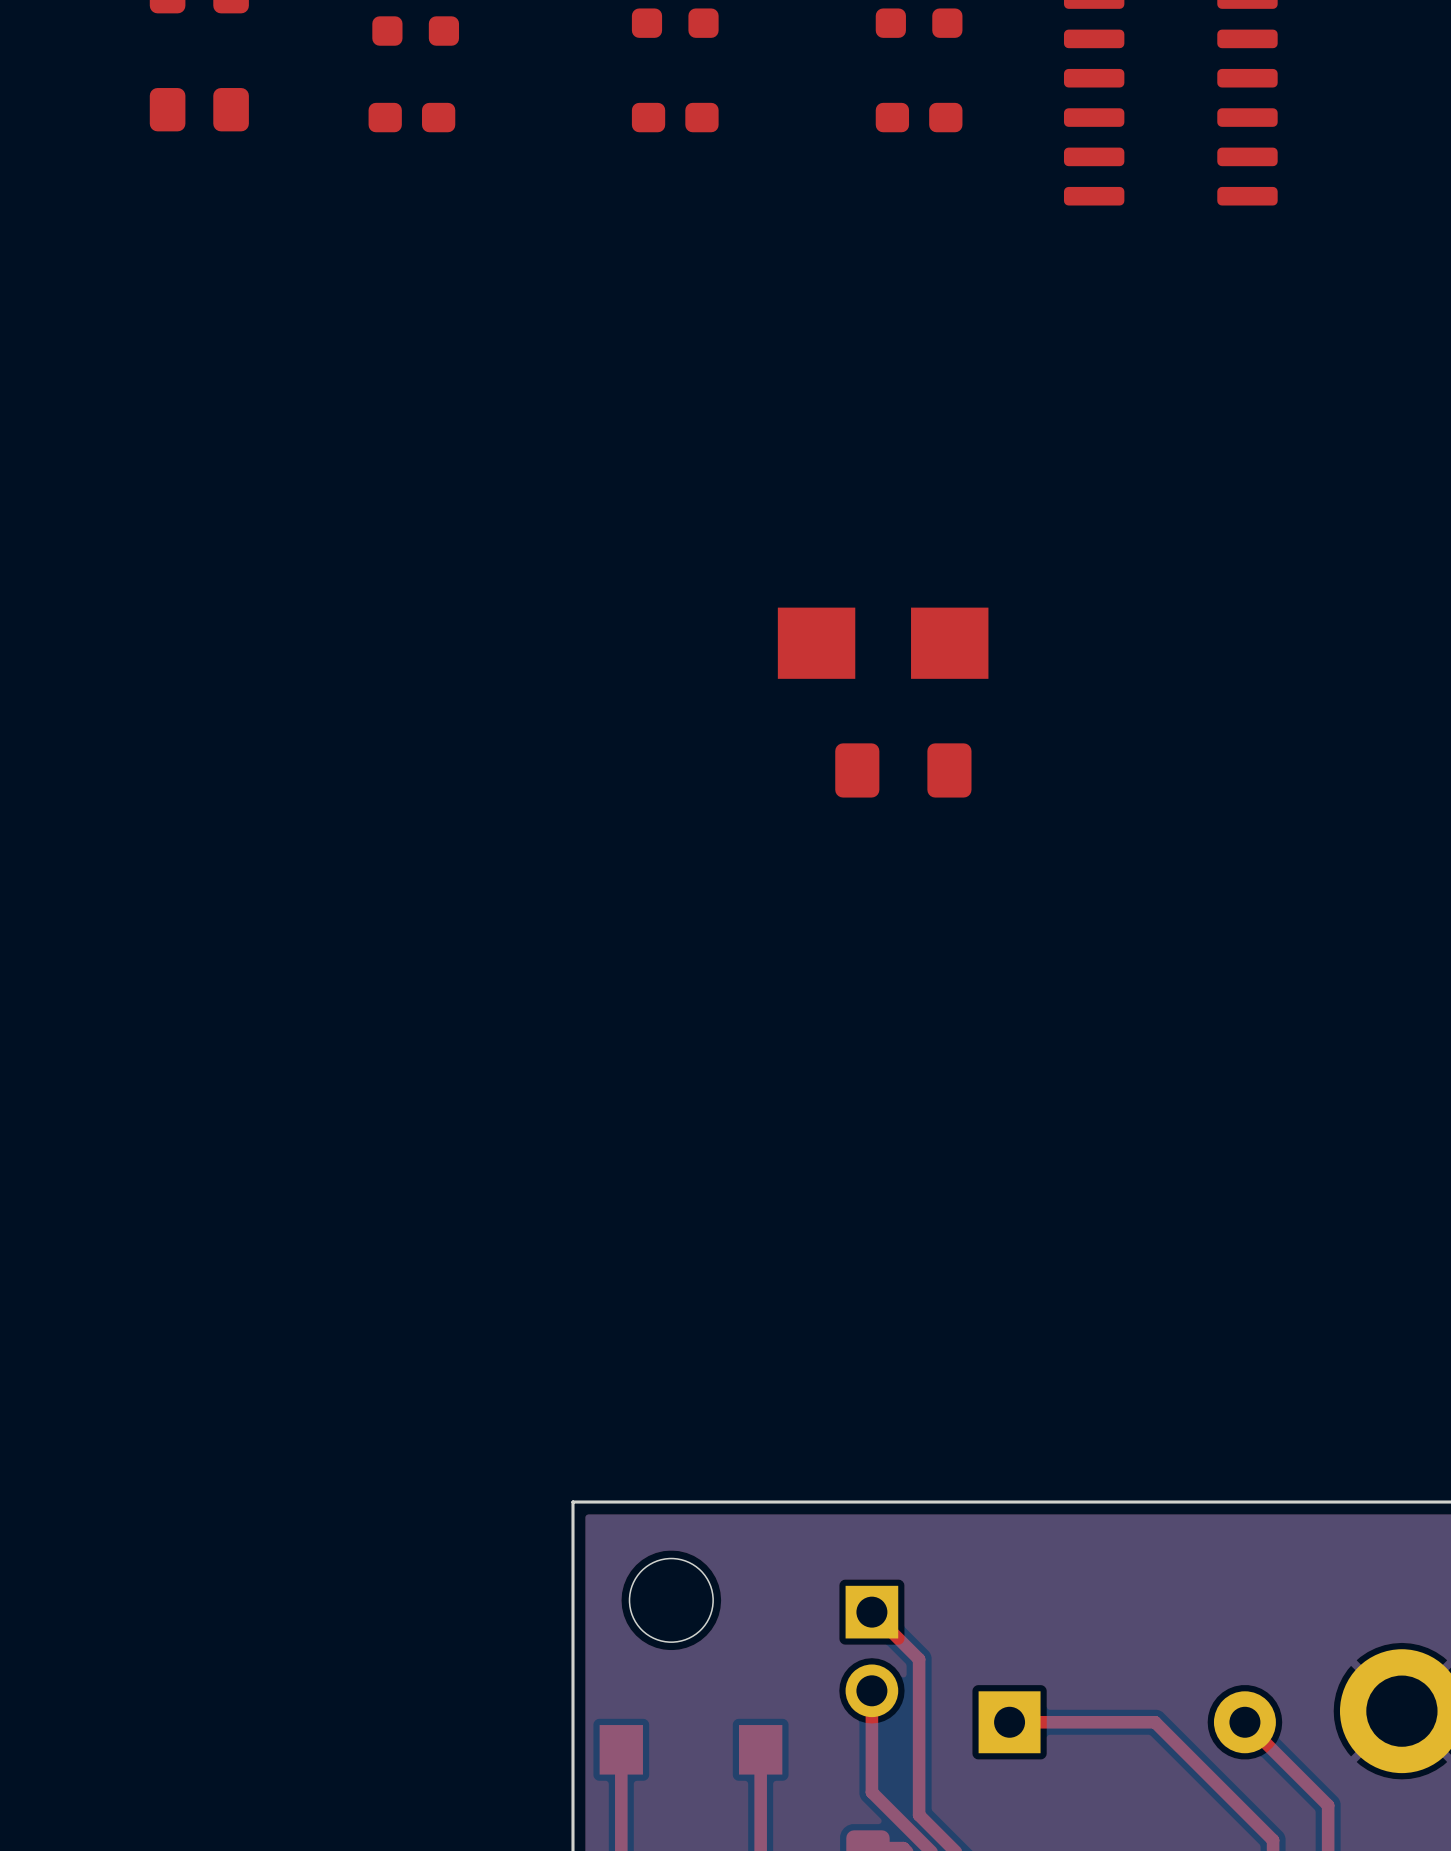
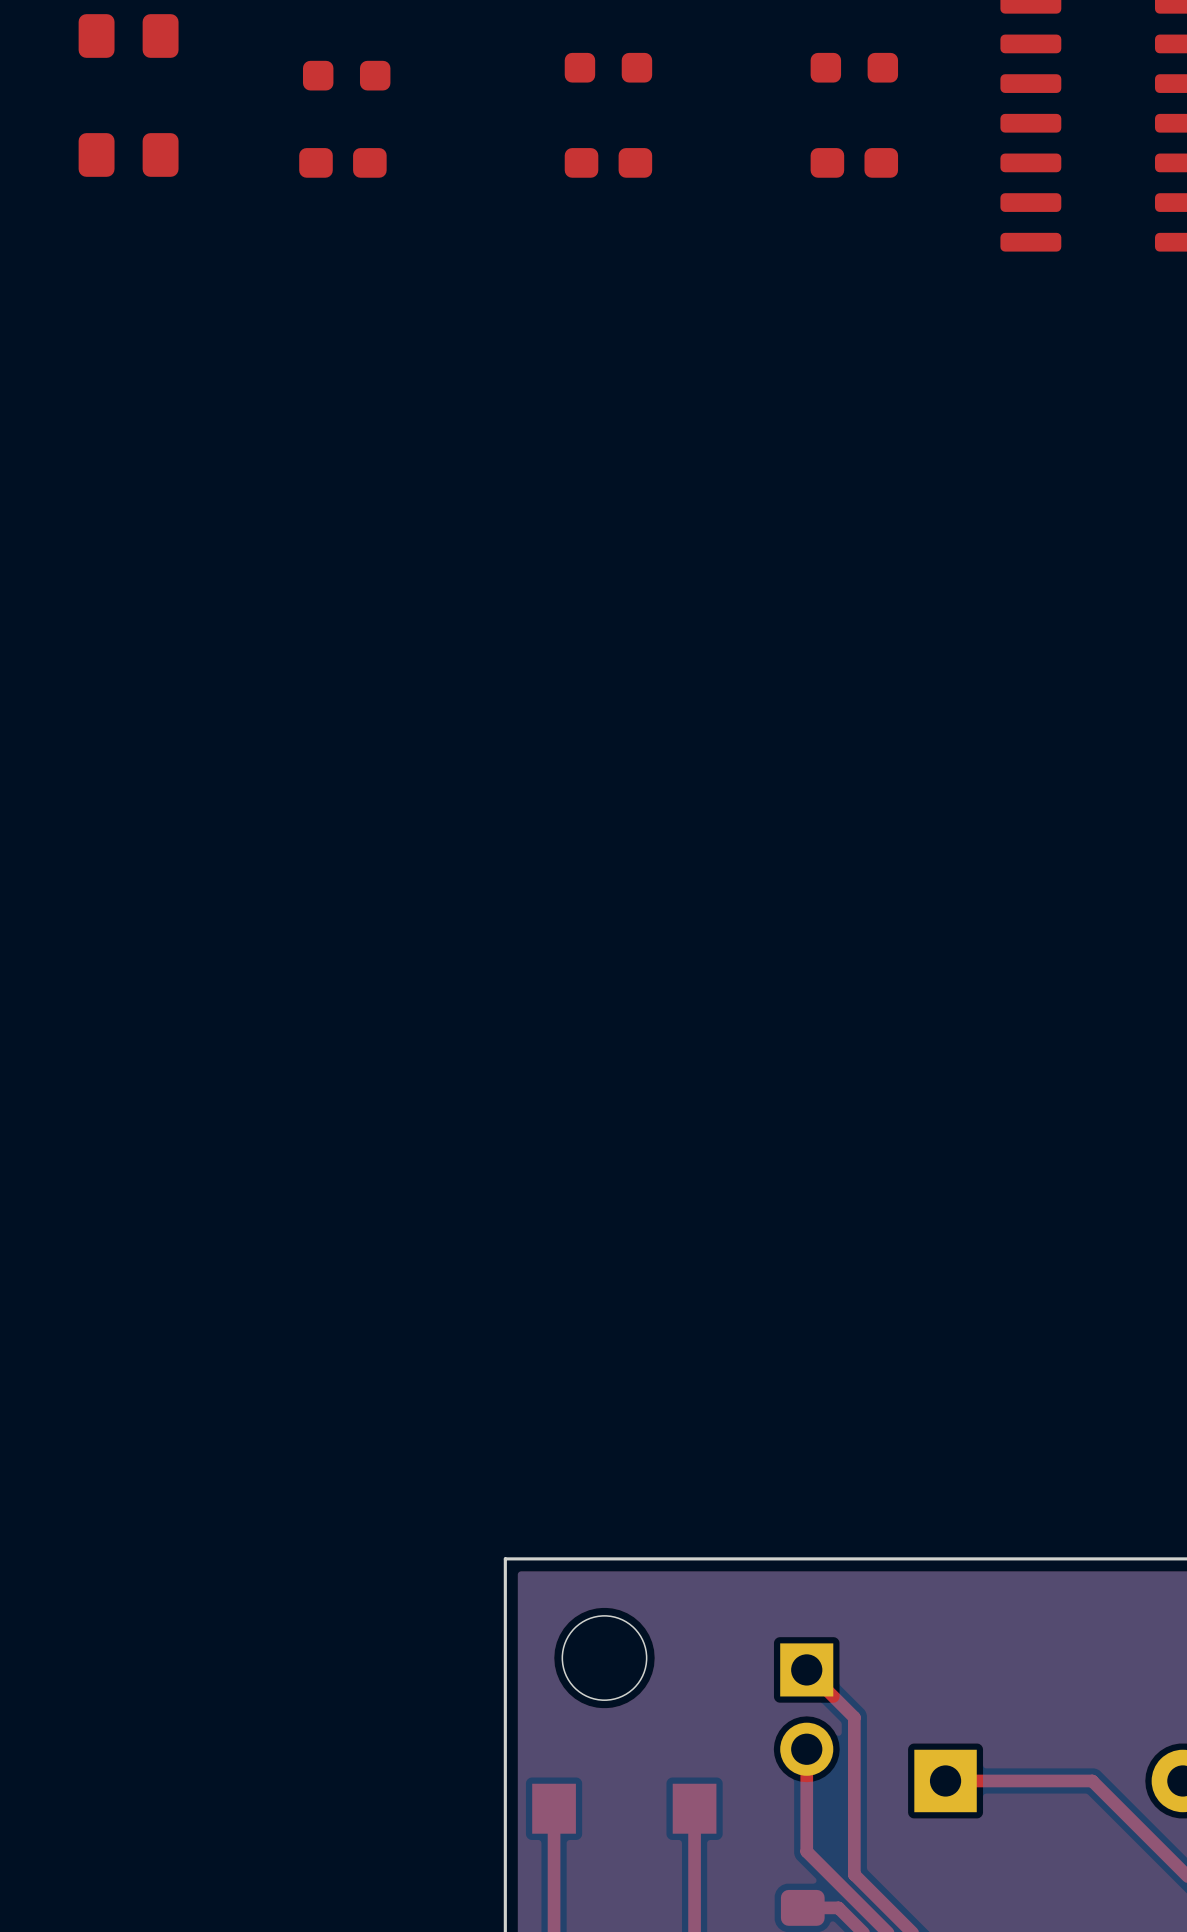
part: (883, 643) -> none
part: (903, 770) -> none

